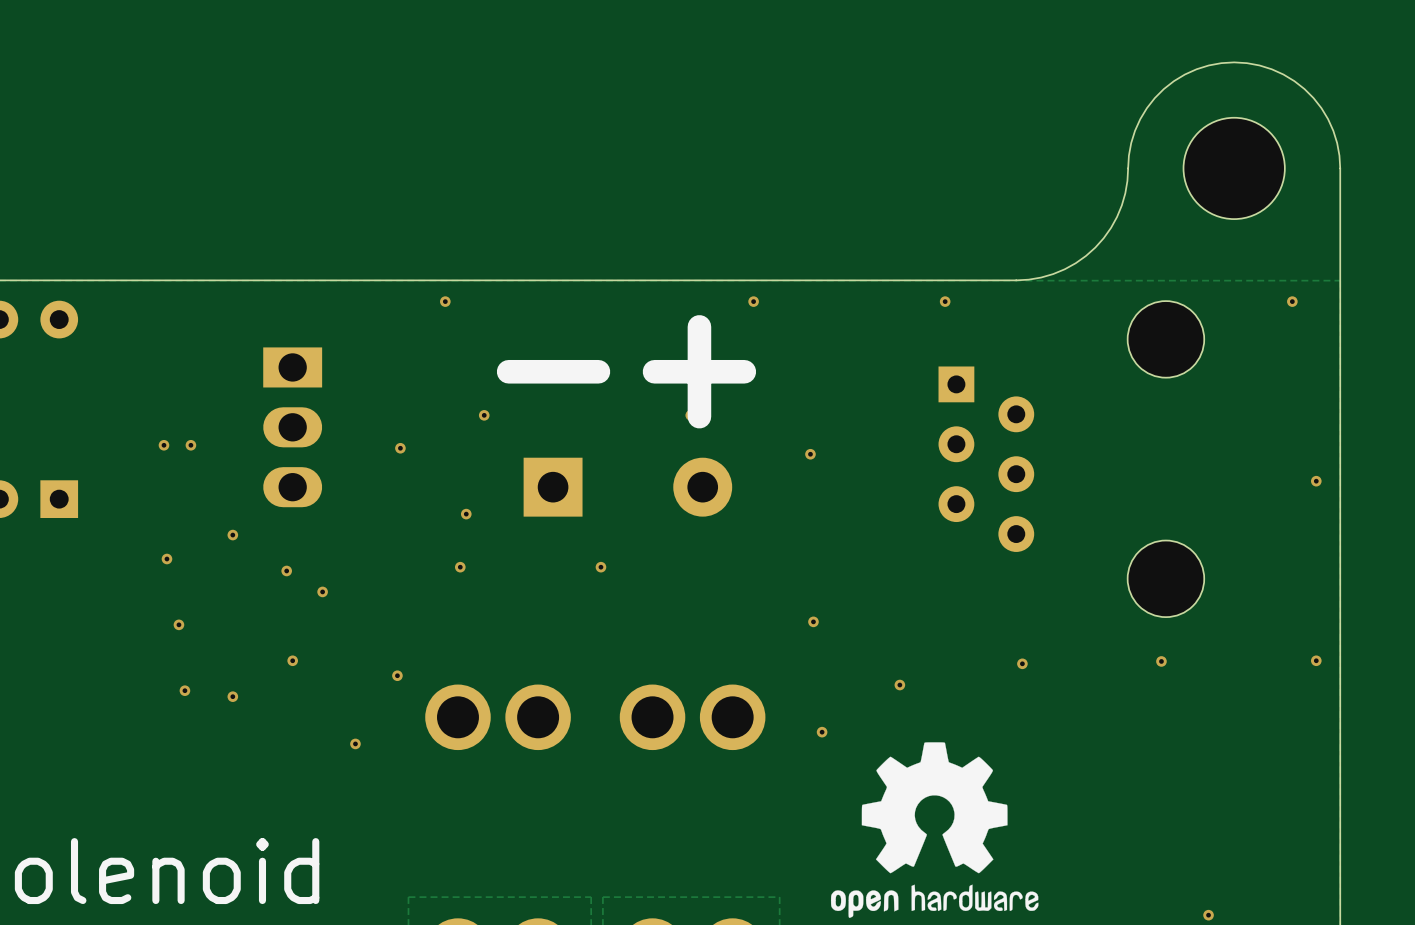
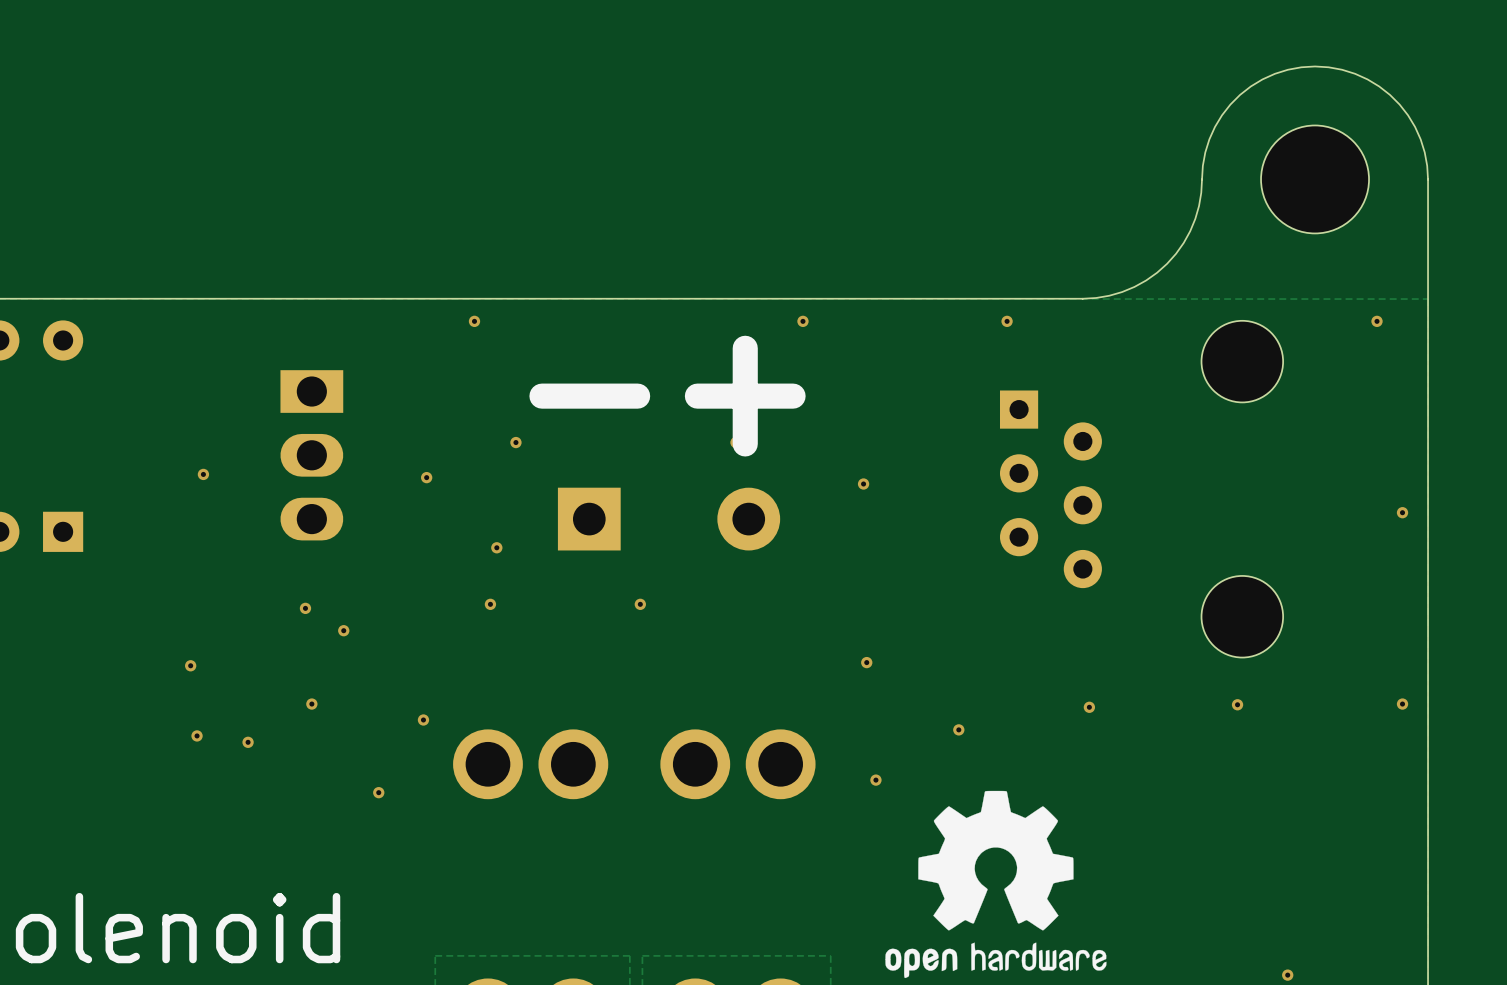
via: (163, 445) -> none
via: (232, 535) -> none
via: (166, 559) -> none

